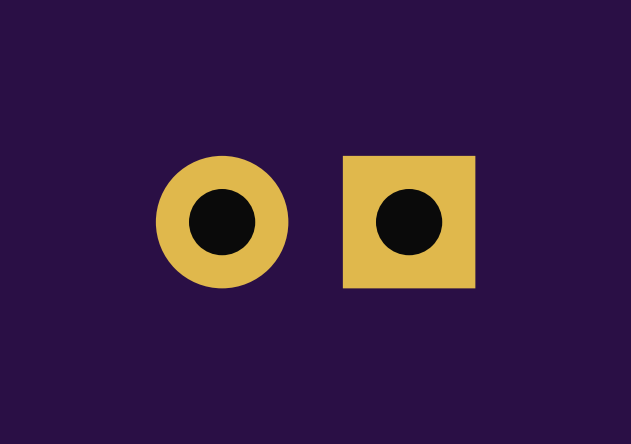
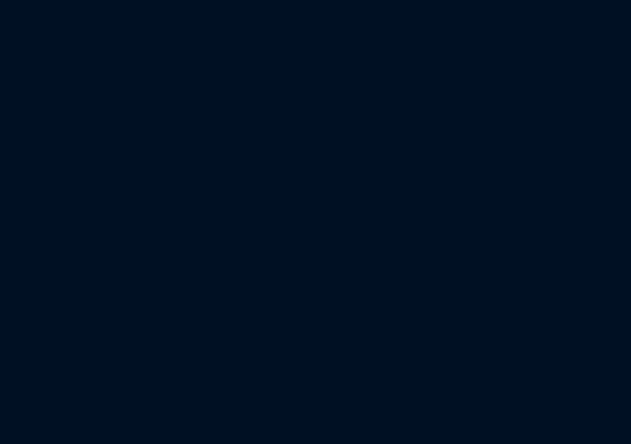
part: (315, 222) -> none

